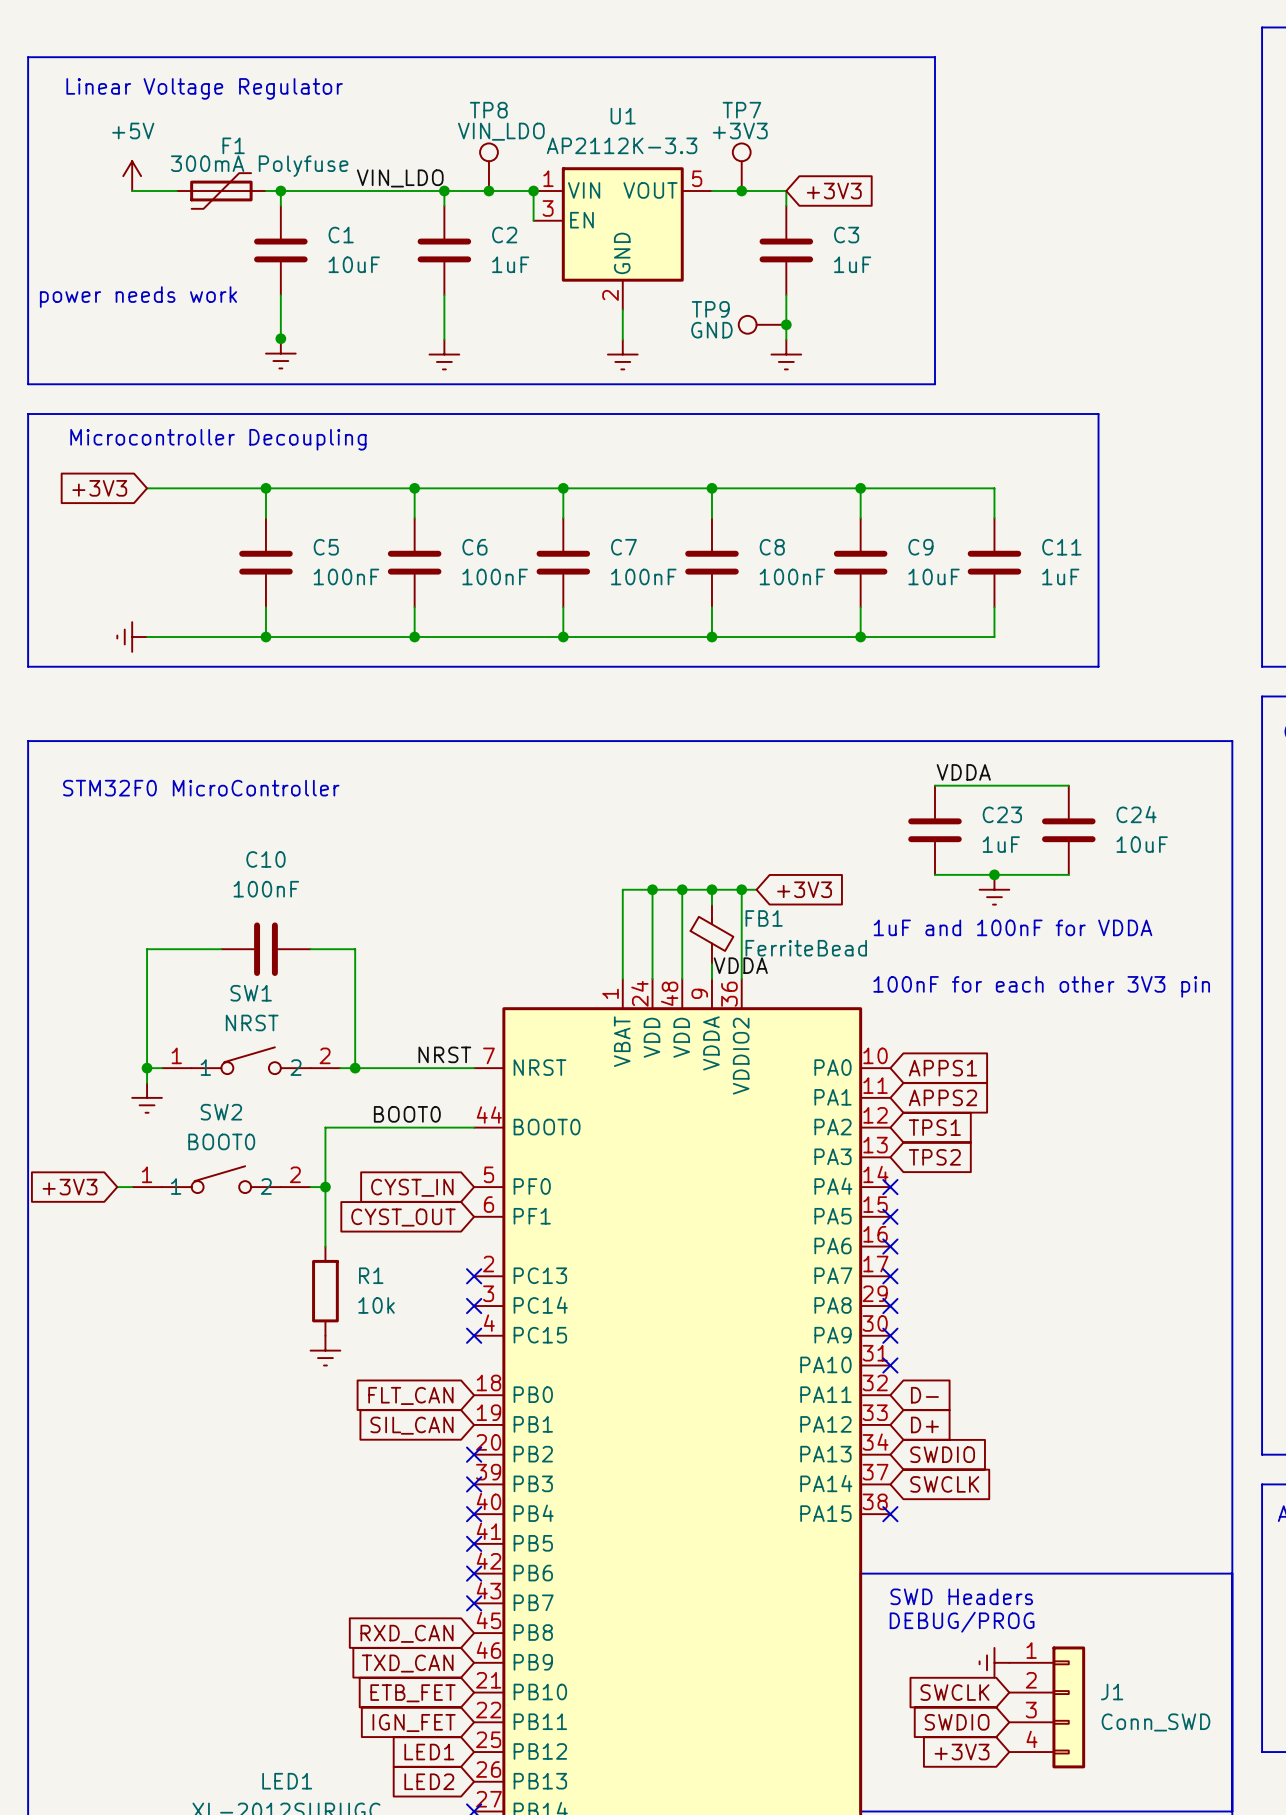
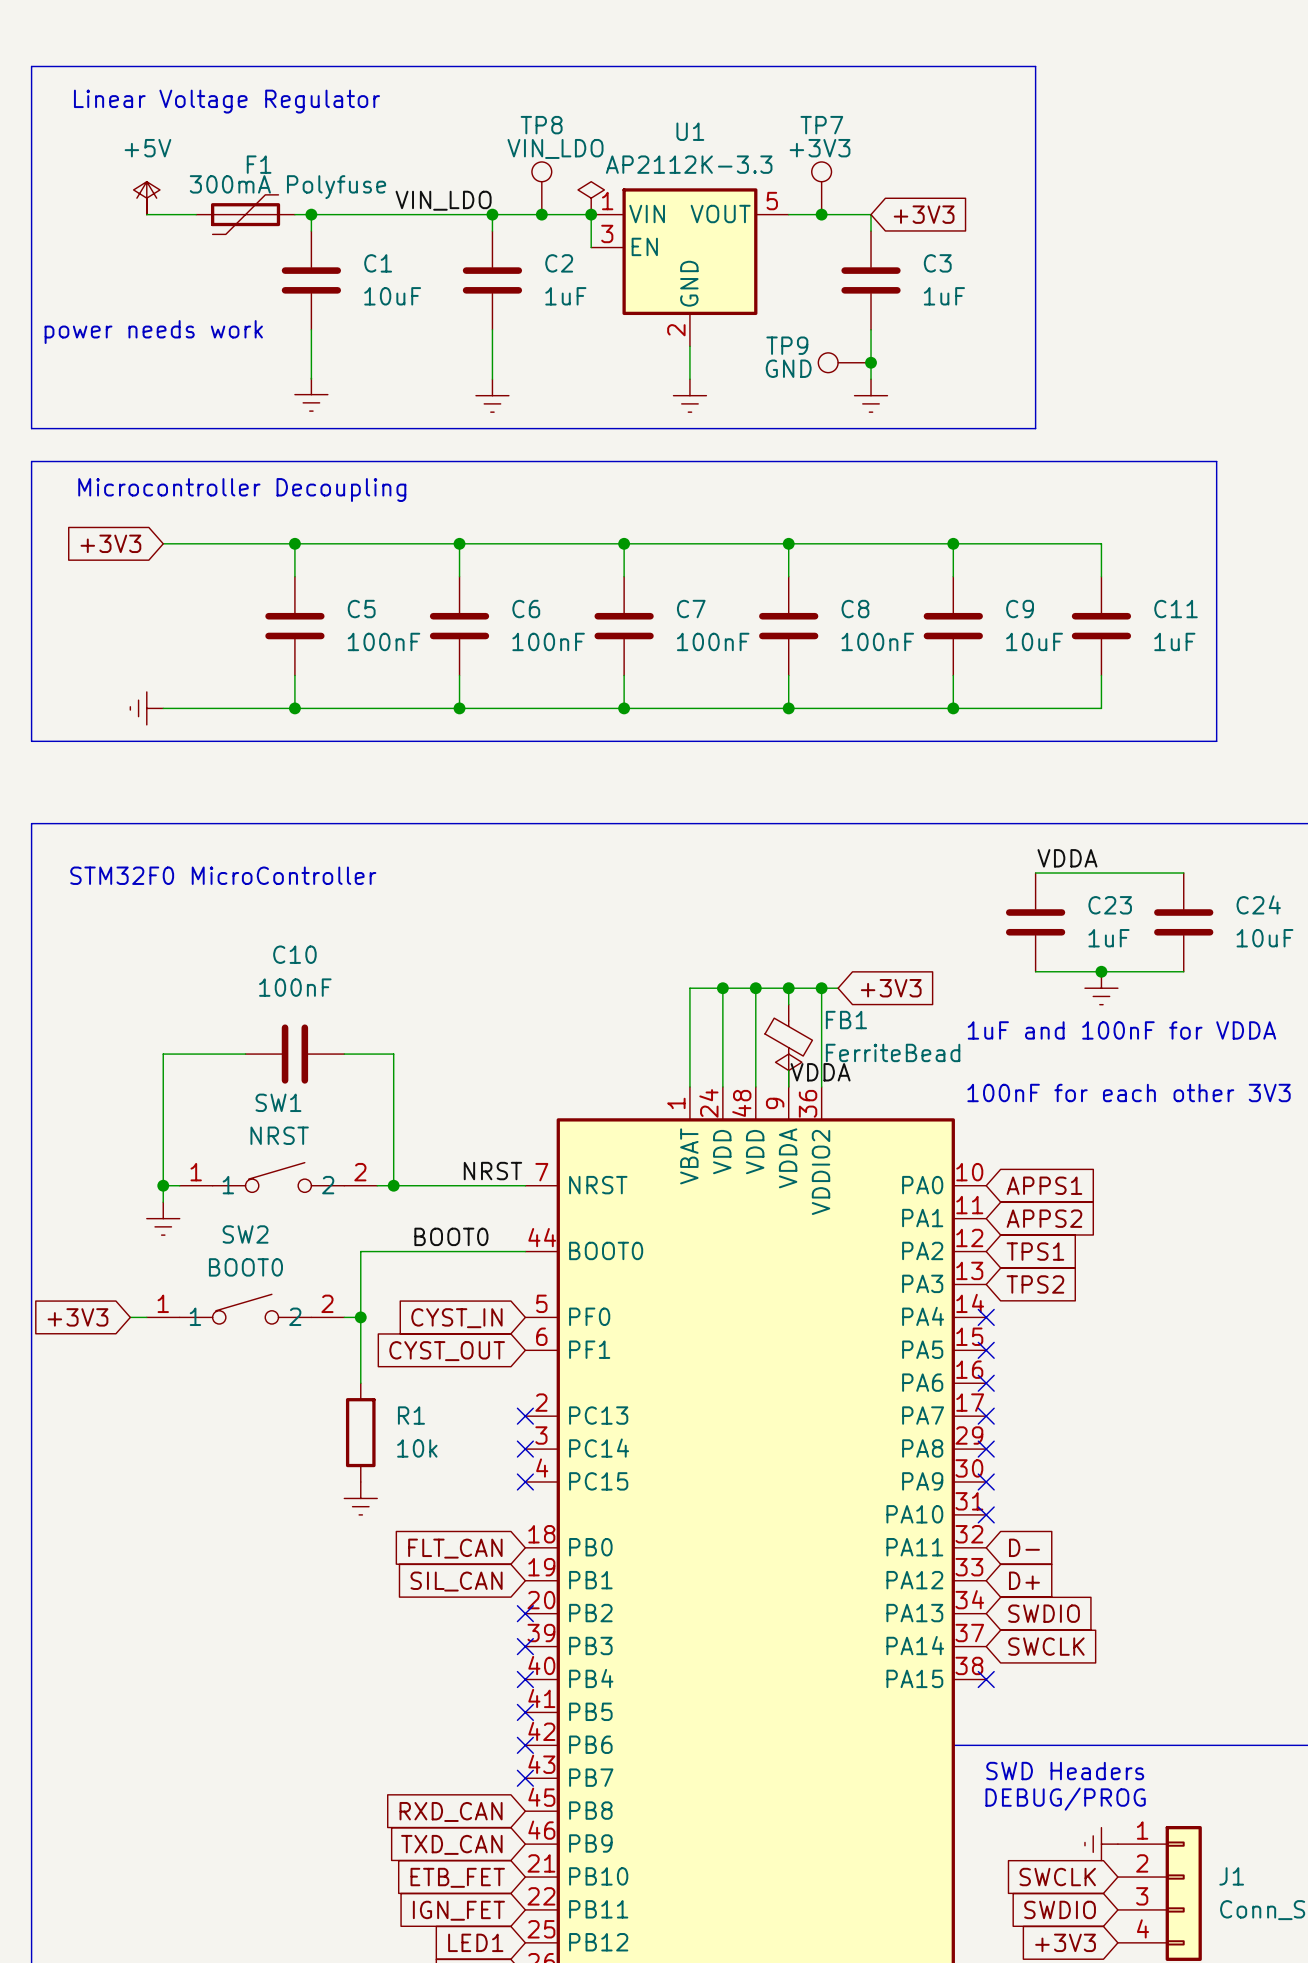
power symbol: none -> (146, 198)
power symbol: none -> (591, 198)
junction: (280, 338) -> none
power symbol: none -> (788, 1070)

